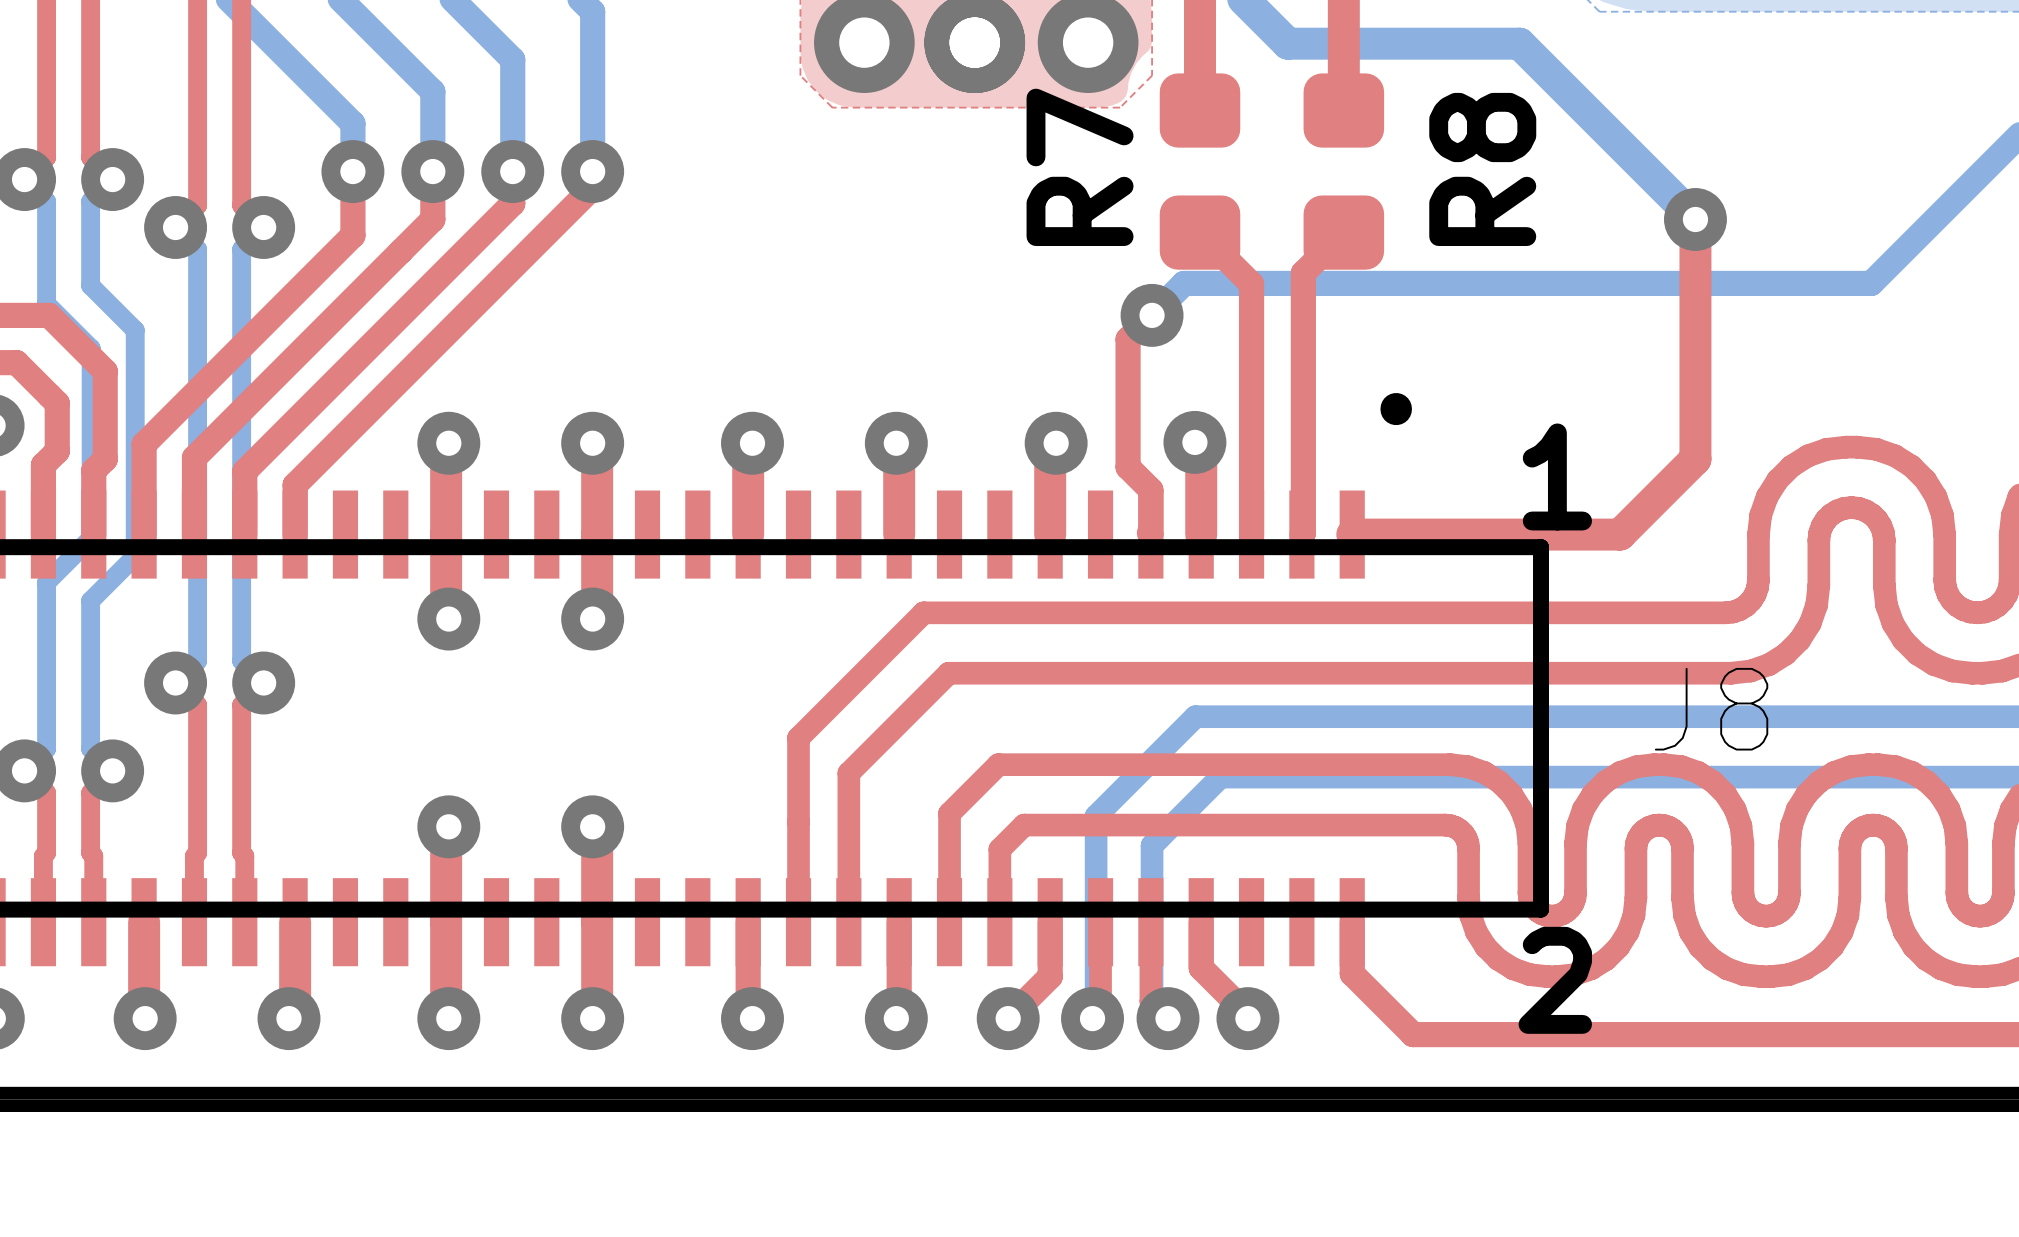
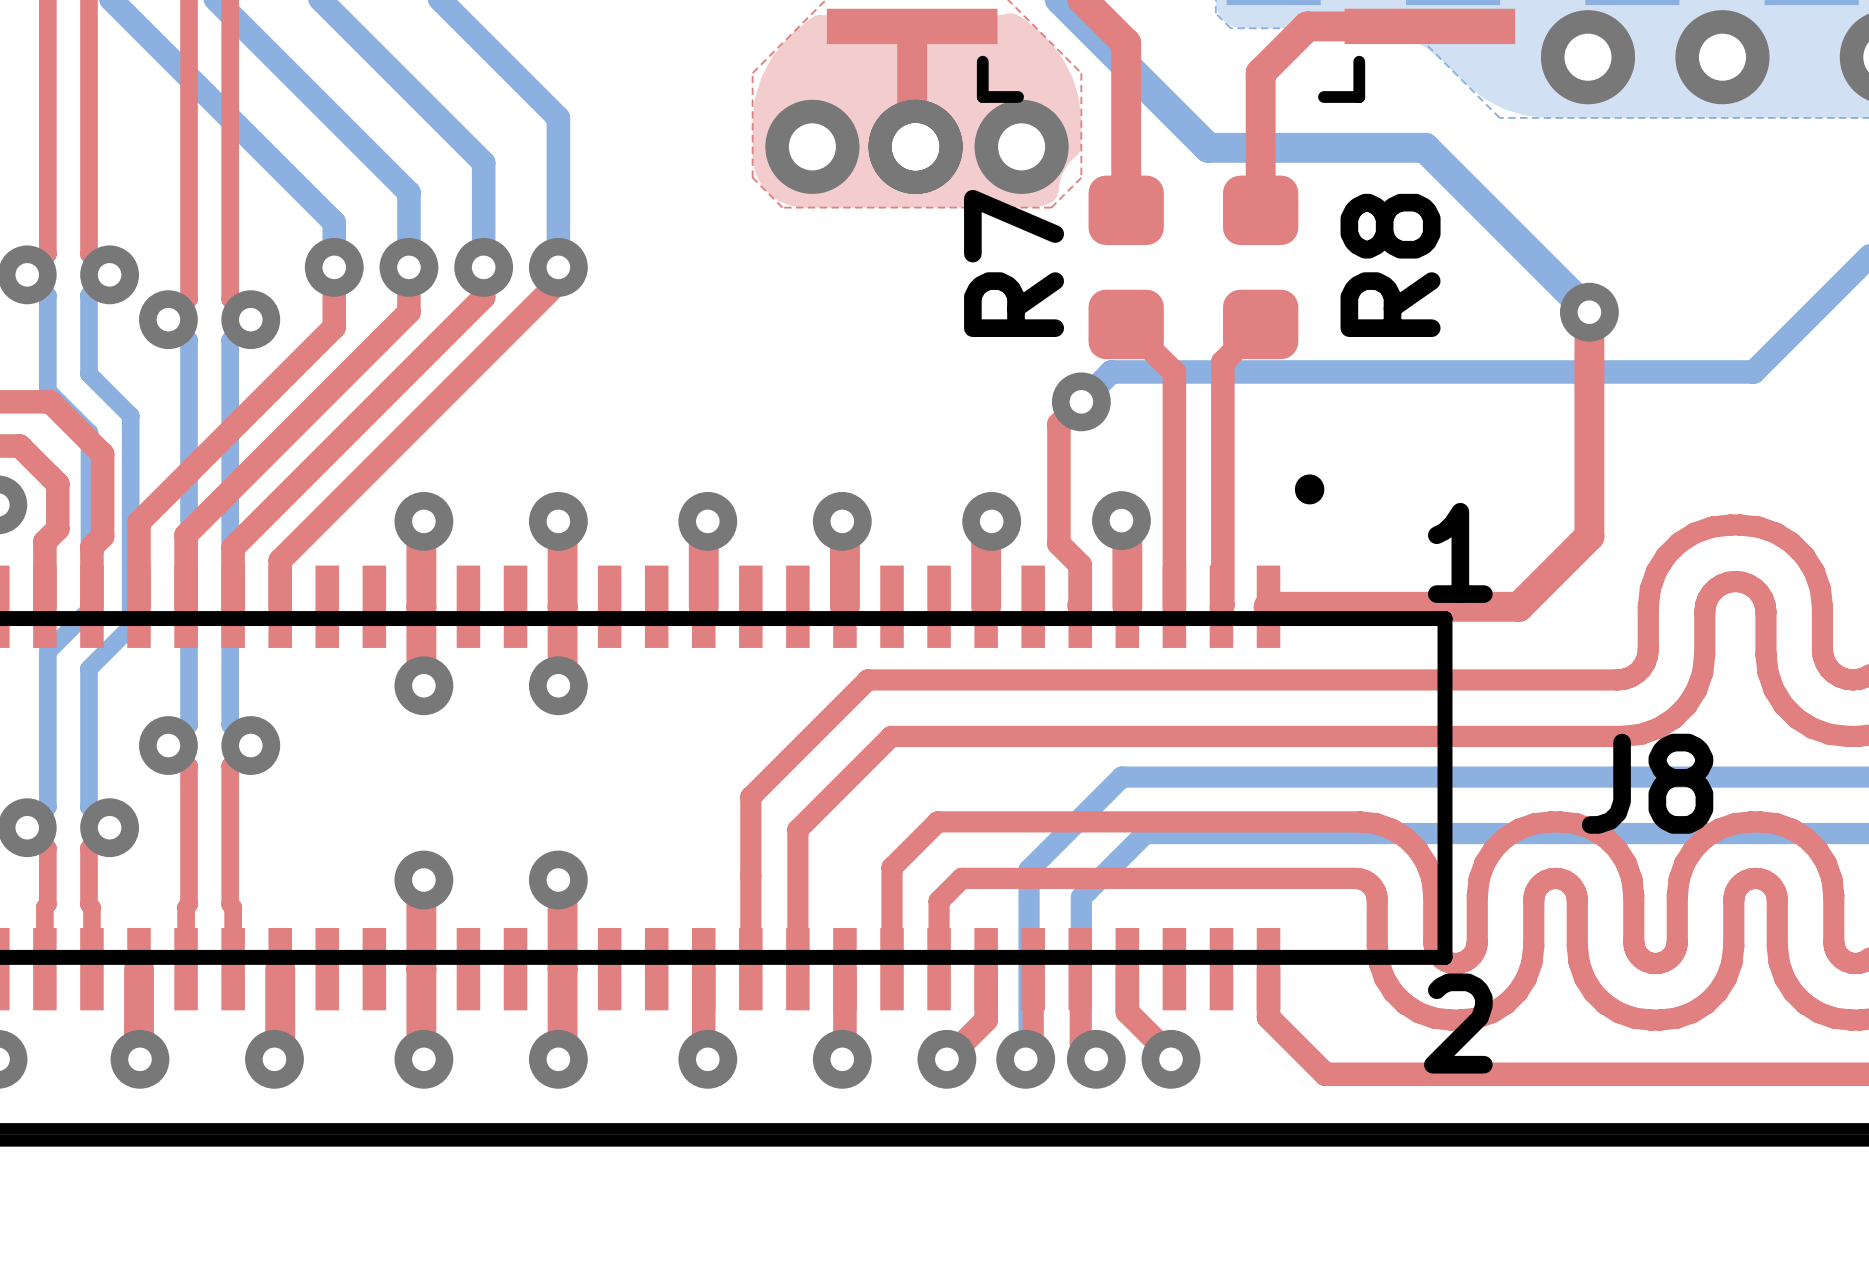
J8 name position: J8 (1711, 709) -> J8 (1647, 783)

